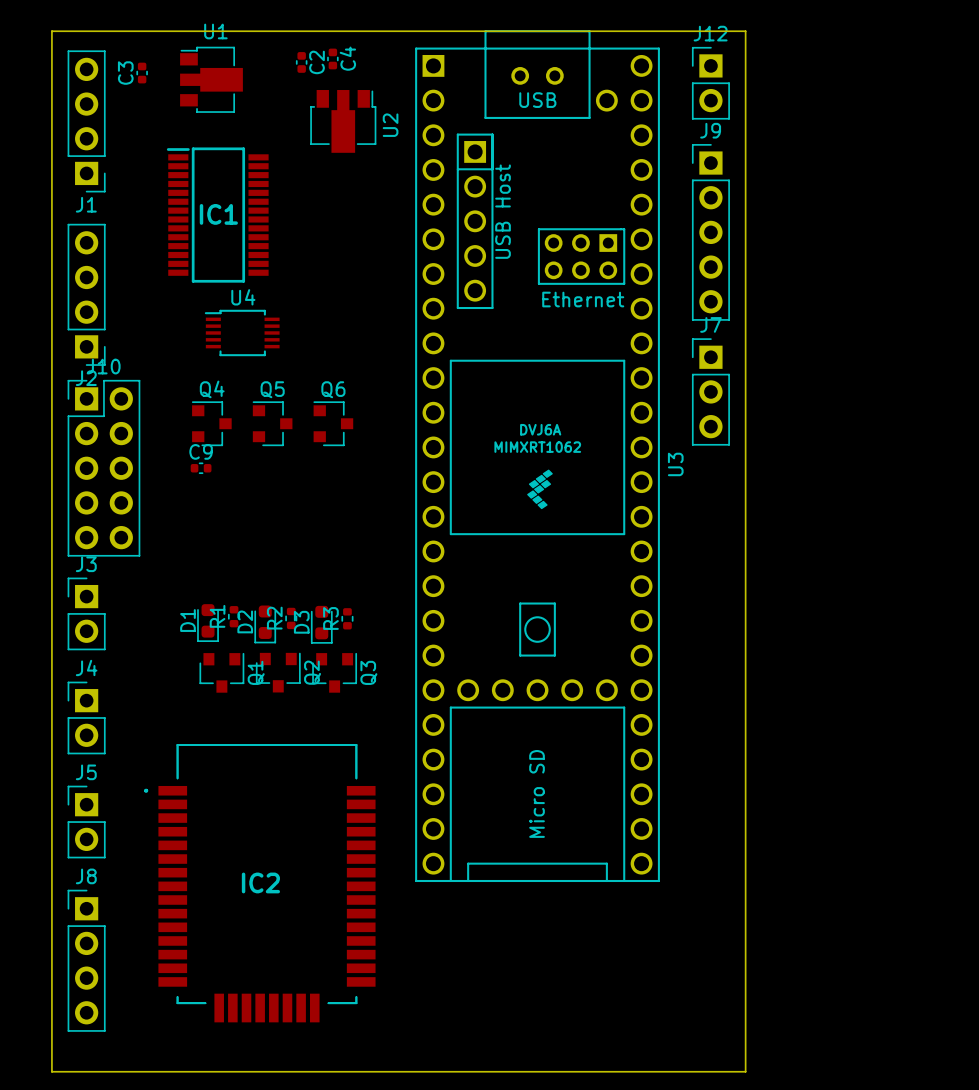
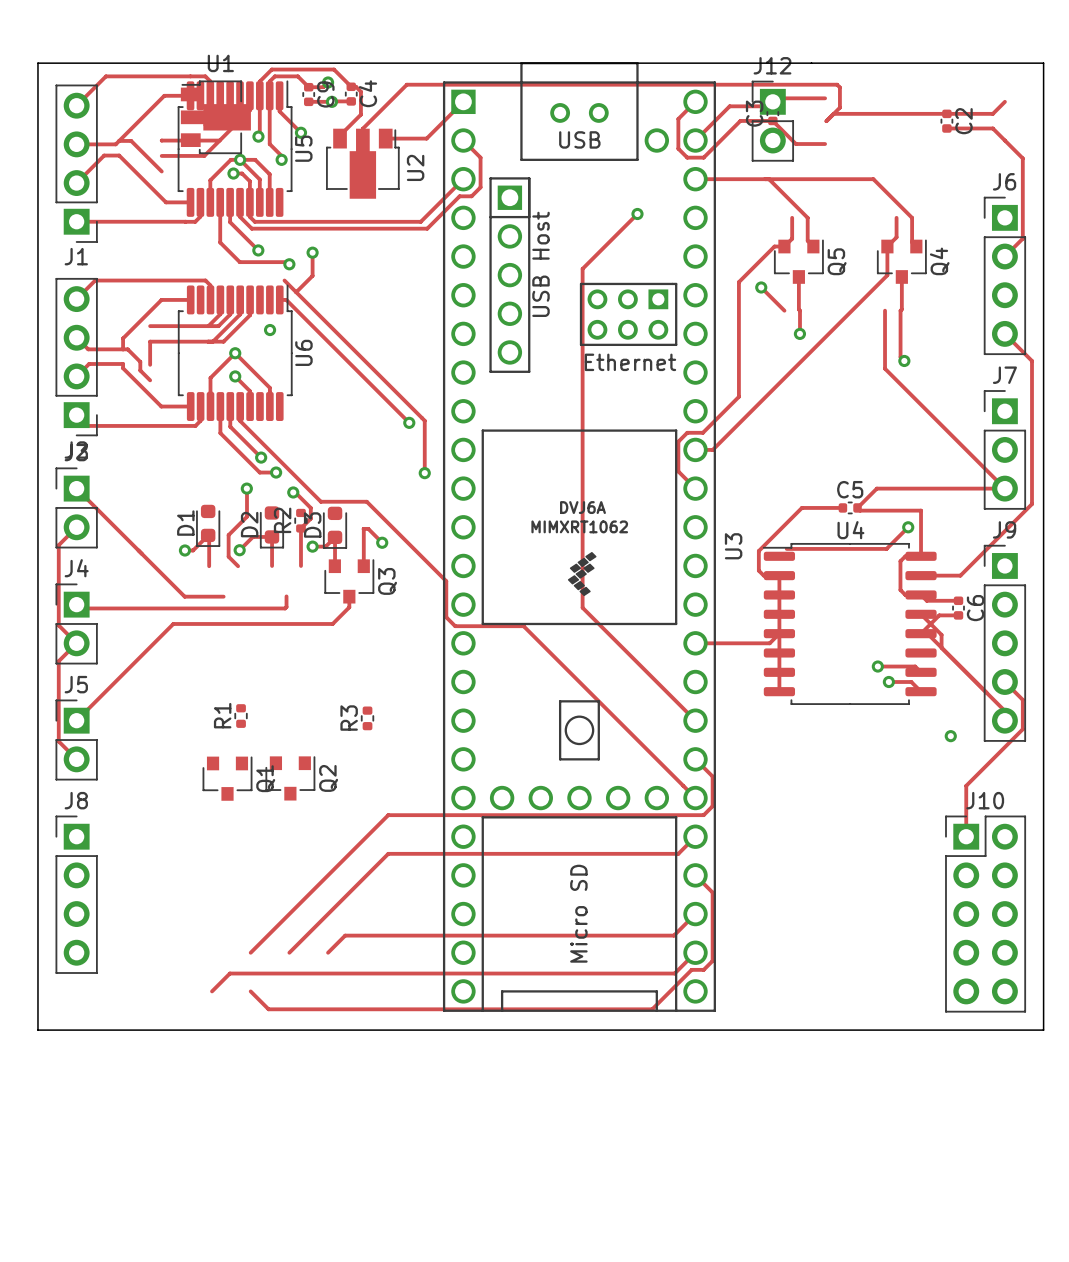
board edge: (745, 31) (745, 1071) (51, 1071) (51, 898) -> (811, 63) (1043, 63) (1043, 1030) (37, 1030)
track: none -> (328, 82) (323, 87) (308, 87) (297, 76) (274, 76) (269, 81) (269, 144) (281, 155) (281, 159)
via: none -> (328, 82)
track: none -> (190, 95) (164, 95) (115, 144) (76, 144)
track: none -> (210, 95) (210, 81) (205, 76) (105, 76) (76, 105)
track: none -> (249, 95) (249, 110) (204, 155) (161, 155)
track: none -> (279, 95) (279, 111) (300, 132)
C2 position: (301, 62) -> (946, 121)
track: none -> (825, 98) (780, 98) (772, 106) (729, 106) (695, 140)
via: none -> (331, 101)
track: none -> (351, 101) (308, 101)
track: none -> (463, 101) (426, 138) (385, 138)
track: none -> (695, 101) (678, 118) (678, 148) (687, 157) (703, 157) (740, 120) (772, 120) (795, 144) (825, 144)
track: none -> (1004, 101) (992, 113) (833, 113)
C3 position: (142, 73) -> (772, 113)
track: none -> (826, 121) (839, 107) (839, 87) (837, 84) (406, 84) (362, 128) (362, 139)
track: none -> (946, 128) (992, 128) (1022, 158) (1022, 238) (1004, 256)
via: none -> (300, 132)
track: none -> (258, 136) (259, 81) (271, 69) (334, 69) (351, 86) (355, 86) (360, 91) (360, 114) (340, 135) (340, 138)
via: none -> (258, 136)
track: none -> (119, 140) (131, 140) (161, 171)
track: none -> (161, 140) (219, 140)
track: none -> (463, 140) (480, 157) (480, 187) (471, 196) (459, 196) (427, 228) (251, 228) (240, 216) (240, 202)
U5: none -> (235, 148)
track: none -> (240, 159) (259, 179) (259, 202)
via: none -> (240, 159)
via: none -> (281, 159)
track: none -> (233, 173) (242, 173) (249, 181) (249, 216) (254, 221) (420, 221) (463, 179)
via: none -> (233, 173)
track: none -> (695, 179) (873, 179) (912, 217) (912, 242) (916, 246)
track: none -> (769, 179) (807, 217) (807, 240) (813, 246)
track: none -> (76, 183) (104, 155) (119, 155) (166, 202) (190, 202)
track: none -> (200, 202) (200, 216) (195, 221) (185, 221)
track: none -> (210, 202) (210, 180) (230, 159) (255, 159) (269, 174) (269, 202)
track: none -> (220, 202) (220, 242) (239, 262) (287, 262) (289, 264)
track: none -> (230, 202) (230, 222) (258, 250)
track: none -> (637, 213) (582, 268) (582, 607) (695, 720)
via: none -> (637, 213)
track: none -> (792, 217) (792, 238) (784, 246) (774, 246) (738, 282) (738, 396) (702, 432) (687, 432) (678, 441) (678, 471) (695, 488)
track: none -> (896, 217) (896, 237) (887, 246) (887, 275) (712, 449) (695, 449)
track: none -> (76, 221) (185, 221)
via: none -> (258, 250)
track: none -> (312, 252) (312, 275) (296, 292)
via: none -> (312, 252)
via: none -> (289, 264)
IC1: (217, 215) -> none
J6: none -> (1004, 275)
track: none -> (798, 276) (799, 333)
track: none -> (901, 276) (900, 357) (904, 360)
track: none -> (284, 280) (424, 420) (424, 473)
track: none -> (761, 287) (784, 310)
via: none -> (761, 287)
J9 position: (710, 232) -> (1004, 643)
track: none -> (76, 299) (95, 280) (205, 280) (210, 285) (210, 299)
track: none -> (190, 299) (161, 299) (123, 338) (123, 349)
track: none -> (220, 299) (220, 314) (208, 326)
track: none -> (230, 299) (230, 314) (218, 326) (150, 326)
track: none -> (240, 299) (240, 314) (212, 341)
track: none -> (250, 299) (250, 315) (223, 341) (150, 341) (150, 364)
track: none -> (279, 299) (286, 299) (409, 422)
track: none -> (885, 310) (885, 368) (1004, 488) (876, 488) (857, 507) (860, 510) (921, 510) (921, 556) (905, 556) (900, 561) (900, 590) (905, 594) (921, 594) (926, 600) (958, 600)
via: none -> (270, 330)
via: none -> (799, 333)
track: none -> (1004, 333) (1031, 360) (1031, 504) (960, 575) (921, 575)
track: none -> (76, 337) (88, 349) (127, 349) (140, 361) (140, 370) (150, 380)
U6: none -> (235, 352)
track: none -> (235, 353) (210, 377) (210, 406)
track: none -> (235, 353) (269, 387) (269, 406)
via: none -> (235, 353)
U4 name position: U4 (243, 297) -> U4 (850, 530)
via: none -> (904, 360)
U4 footprint: [204, 309, 280, 357] -> [762, 542, 937, 705]
track: none -> (76, 376) (89, 363) (123, 363) (123, 368) (161, 406) (190, 406)
track: none -> (235, 376) (250, 391) (250, 406)
via: none -> (235, 376)
track: none -> (200, 406) (200, 420) (195, 425) (87, 425) (76, 415)
track: none -> (220, 406) (220, 433) (259, 472) (276, 472)
track: none -> (230, 406) (230, 426) (261, 457)
track: none -> (240, 406) (240, 421) (320, 501) (366, 501) (446, 581) (446, 617) (455, 626) (523, 626) (695, 798)
via: none -> (409, 422)
via: none -> (261, 457)
J7 position: (710, 391) -> (1004, 449)
via: none -> (276, 472)
via: none -> (424, 473)
track: none -> (76, 488) (184, 596) (223, 596)
track: none -> (246, 488) (246, 516) (228, 535) (228, 556) (238, 566)
via: none -> (246, 488)
track: none -> (293, 492) (310, 507) (310, 518) (300, 528) (300, 565)
via: none -> (293, 492)
Q4 rotation: 0° (211, 423) -> 90° clockwise (901, 261)
Q4 position: (211, 423) -> (901, 261)
Q5 rotation: 0° (272, 423) -> 90° clockwise (798, 261)
Q5 position: (272, 423) -> (798, 261)
Q6: (333, 423) -> none
track: none -> (842, 507) (801, 507) (758, 551) (758, 570) (763, 575) (779, 575) (779, 691)
C5: none -> (850, 507)
track: none -> (76, 527) (58, 545) (58, 625) (76, 643) (58, 661) (58, 741) (76, 759)
track: none -> (908, 527) (886, 548) (786, 548)
via: none -> (908, 527)
track: none -> (363, 528) (368, 528) (382, 542)
track: none -> (363, 529) (363, 566)
via: none -> (382, 542)
track: none -> (312, 546) (325, 546) (335, 537) (335, 566)
via: none -> (312, 546)
J10 position: (103, 468) -> (985, 914)
track: none -> (184, 550) (193, 550) (208, 535) (209, 566)
via: none -> (184, 550)
C9 rotation: 0° (201, 468) -> 90° clockwise (308, 94)
C9 position: (201, 468) -> (308, 94)
track: none -> (239, 550) (252, 536) (271, 536) (272, 565)
via: none -> (239, 550)
track: none -> (286, 596) (285, 608) (80, 608) (76, 604)
track: none -> (349, 596) (349, 607) (332, 623) (173, 623) (76, 720)
C6: none -> (958, 608)
track: none -> (921, 614) (941, 634) (941, 647)
track: none -> (958, 615) (939, 615) (921, 633) (927, 633) (1004, 711) (1004, 720)
track: none -> (779, 633) (769, 643) (695, 643)
track: none -> (877, 666) (915, 666) (921, 672)
via: none -> (877, 666)
track: none -> (888, 681) (911, 681) (921, 691)
via: none -> (888, 681)
track: none -> (1004, 681) (1022, 699) (1022, 729) (966, 785) (966, 836)
J3 position: (86, 613) -> (76, 507)
R2 position: (291, 618) -> (300, 520)
D1 position: (208, 623) -> (208, 525)
D2 position: (265, 624) -> (271, 527)
D3 position: (321, 624) -> (335, 527)
via: none -> (950, 736)
track: none -> (695, 759) (712, 776) (712, 806) (703, 815) (388, 815) (250, 952)
Q3 position: (334, 672) -> (349, 581)
J4 position: (86, 717) -> (76, 623)
track: none -> (695, 836) (678, 853) (388, 853) (289, 952)
track: none -> (695, 875) (712, 892) (712, 960) (703, 969) (691, 969) (652, 1009) (268, 1009) (250, 991)
track: none -> (695, 914) (673, 935) (345, 935) (328, 952)
J5 position: (86, 822) -> (76, 740)
track: none -> (695, 952) (674, 973) (229, 973) (212, 991)
IC2: (259, 883) -> none
J8 position: (86, 960) -> (76, 894)

